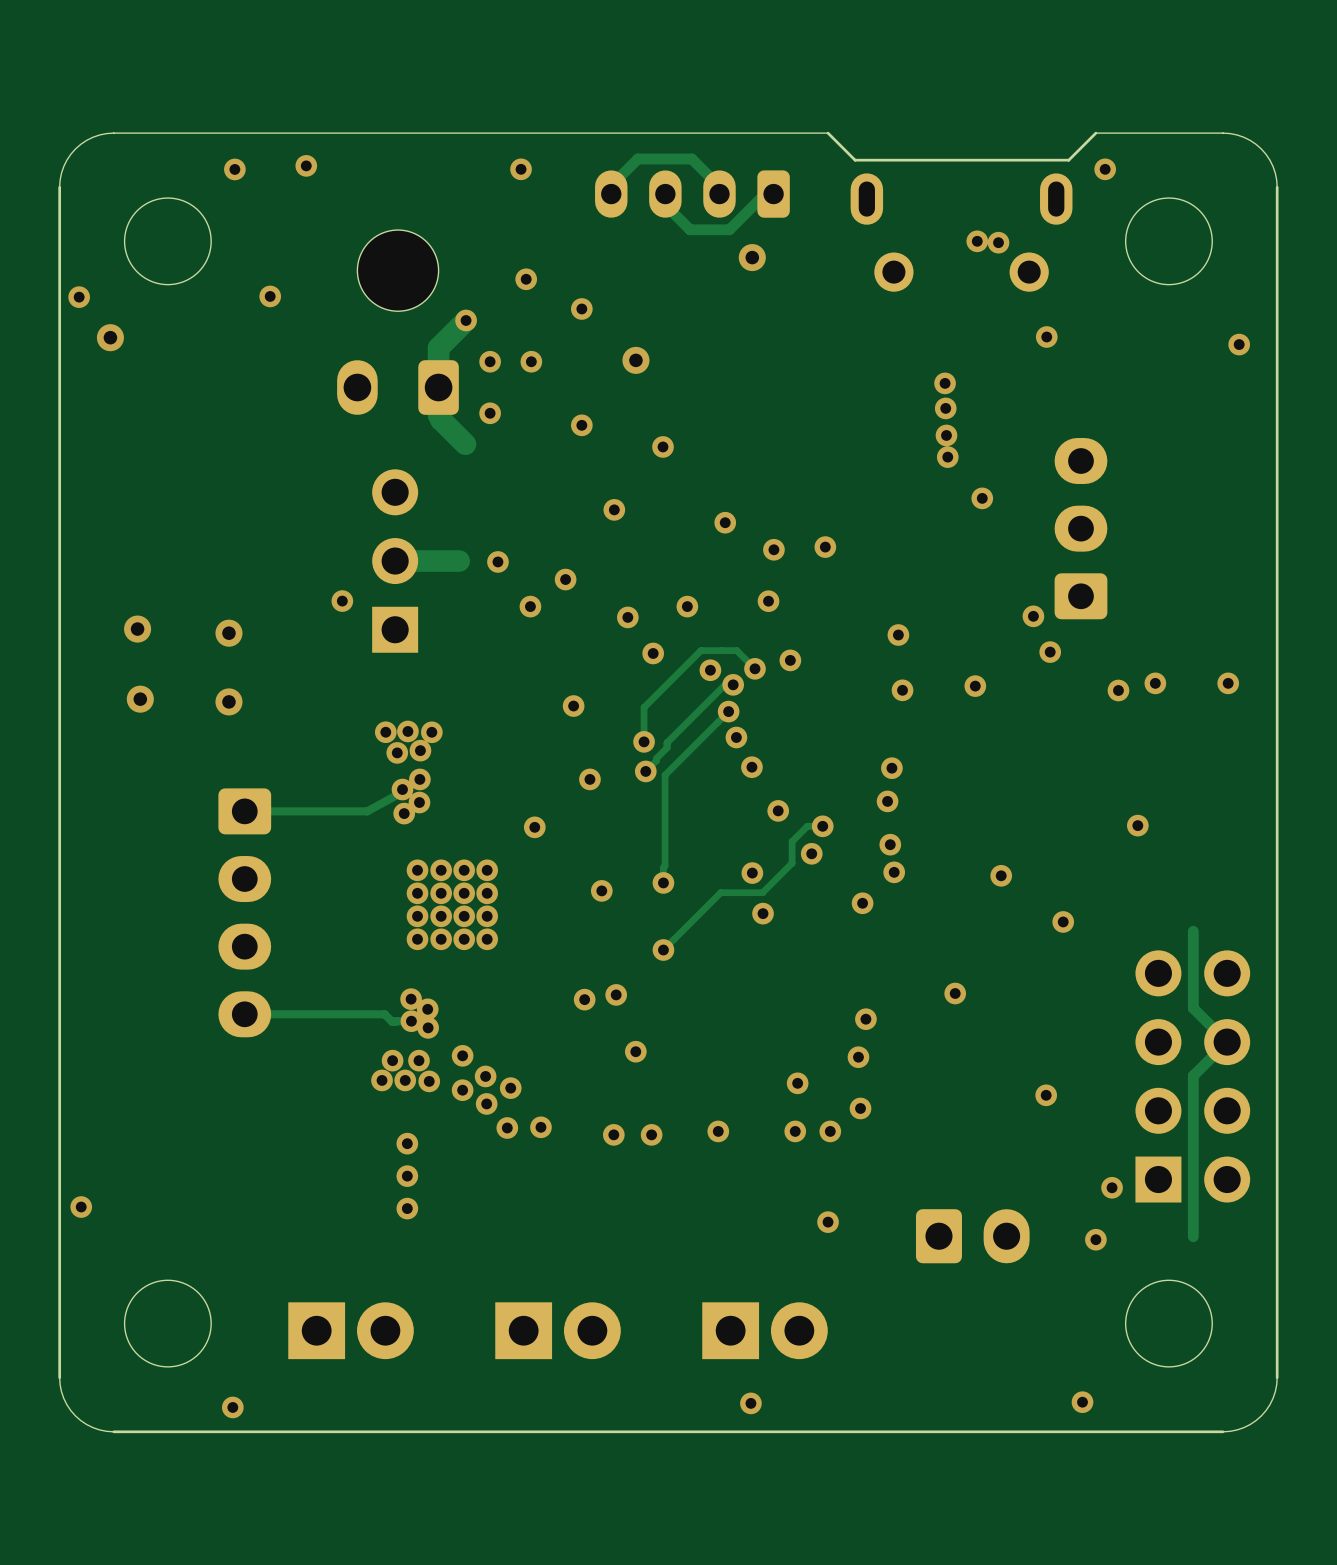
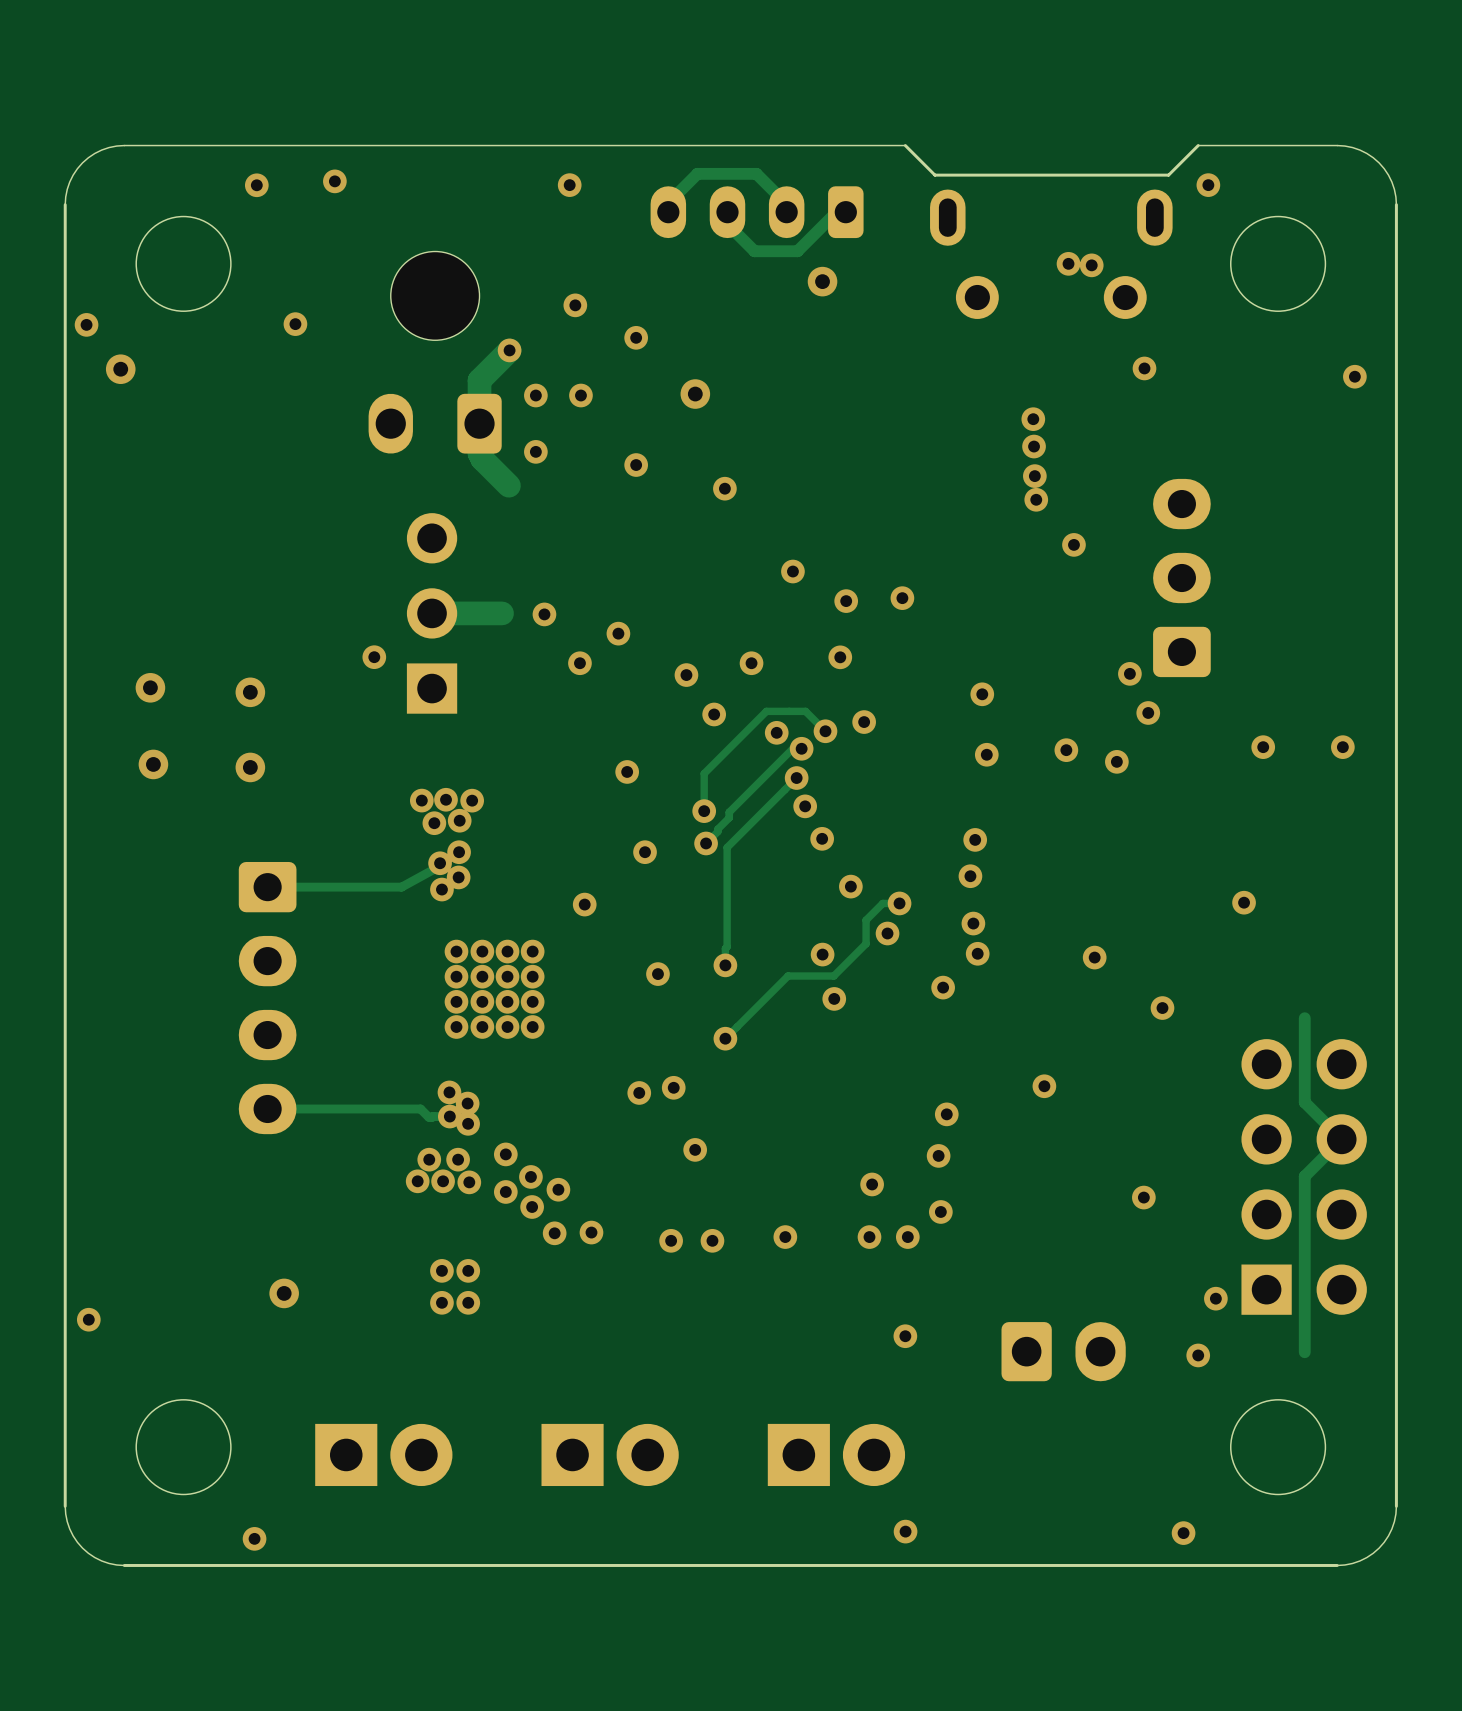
via: (614, 509) -> none
via position: (1118, 690) -> (1116, 761)
via: (407, 1143) -> none
via: none -> (441, 1270)
via: none -> (468, 1270)
via: (407, 1176) -> none
via: none -> (284, 1293)
via: none -> (441, 1302)
via: none -> (468, 1302)
via: (407, 1208) -> none
via position: (750, 1403) -> (905, 1531)

